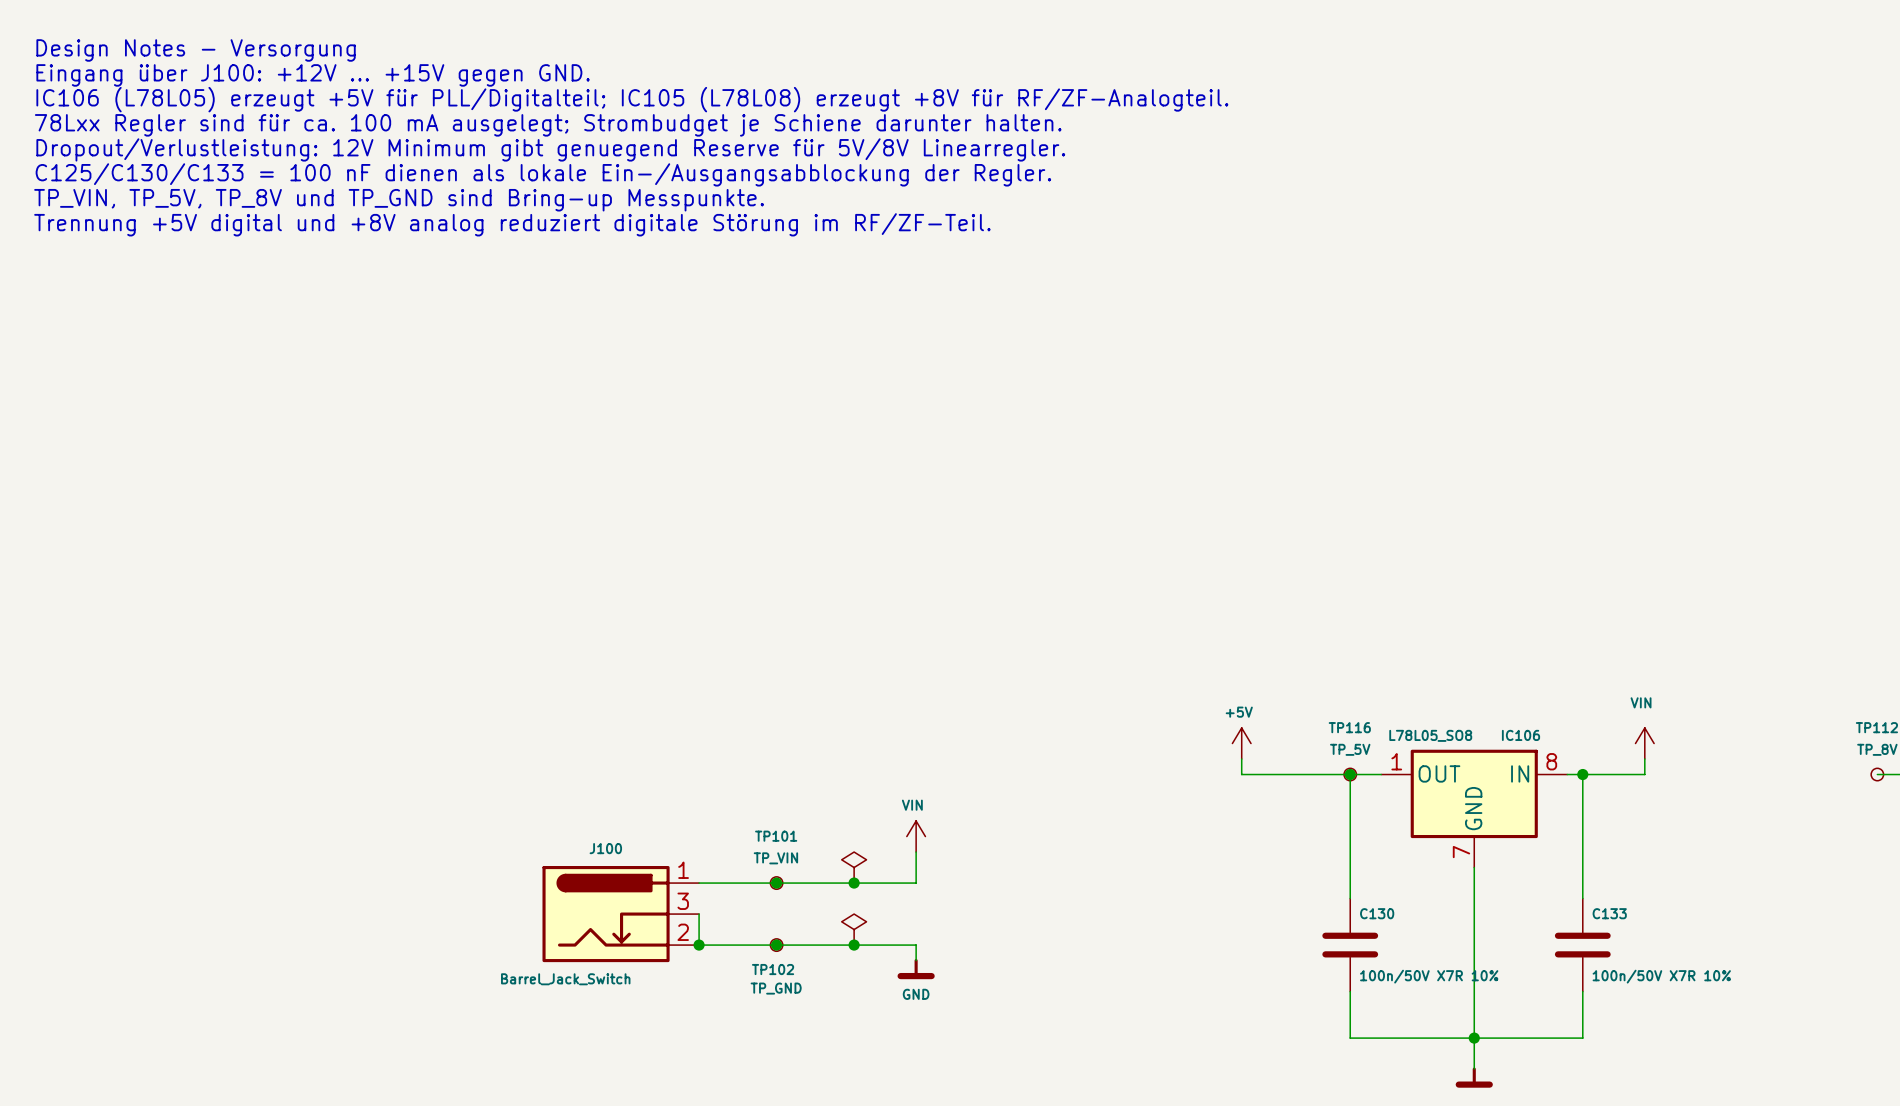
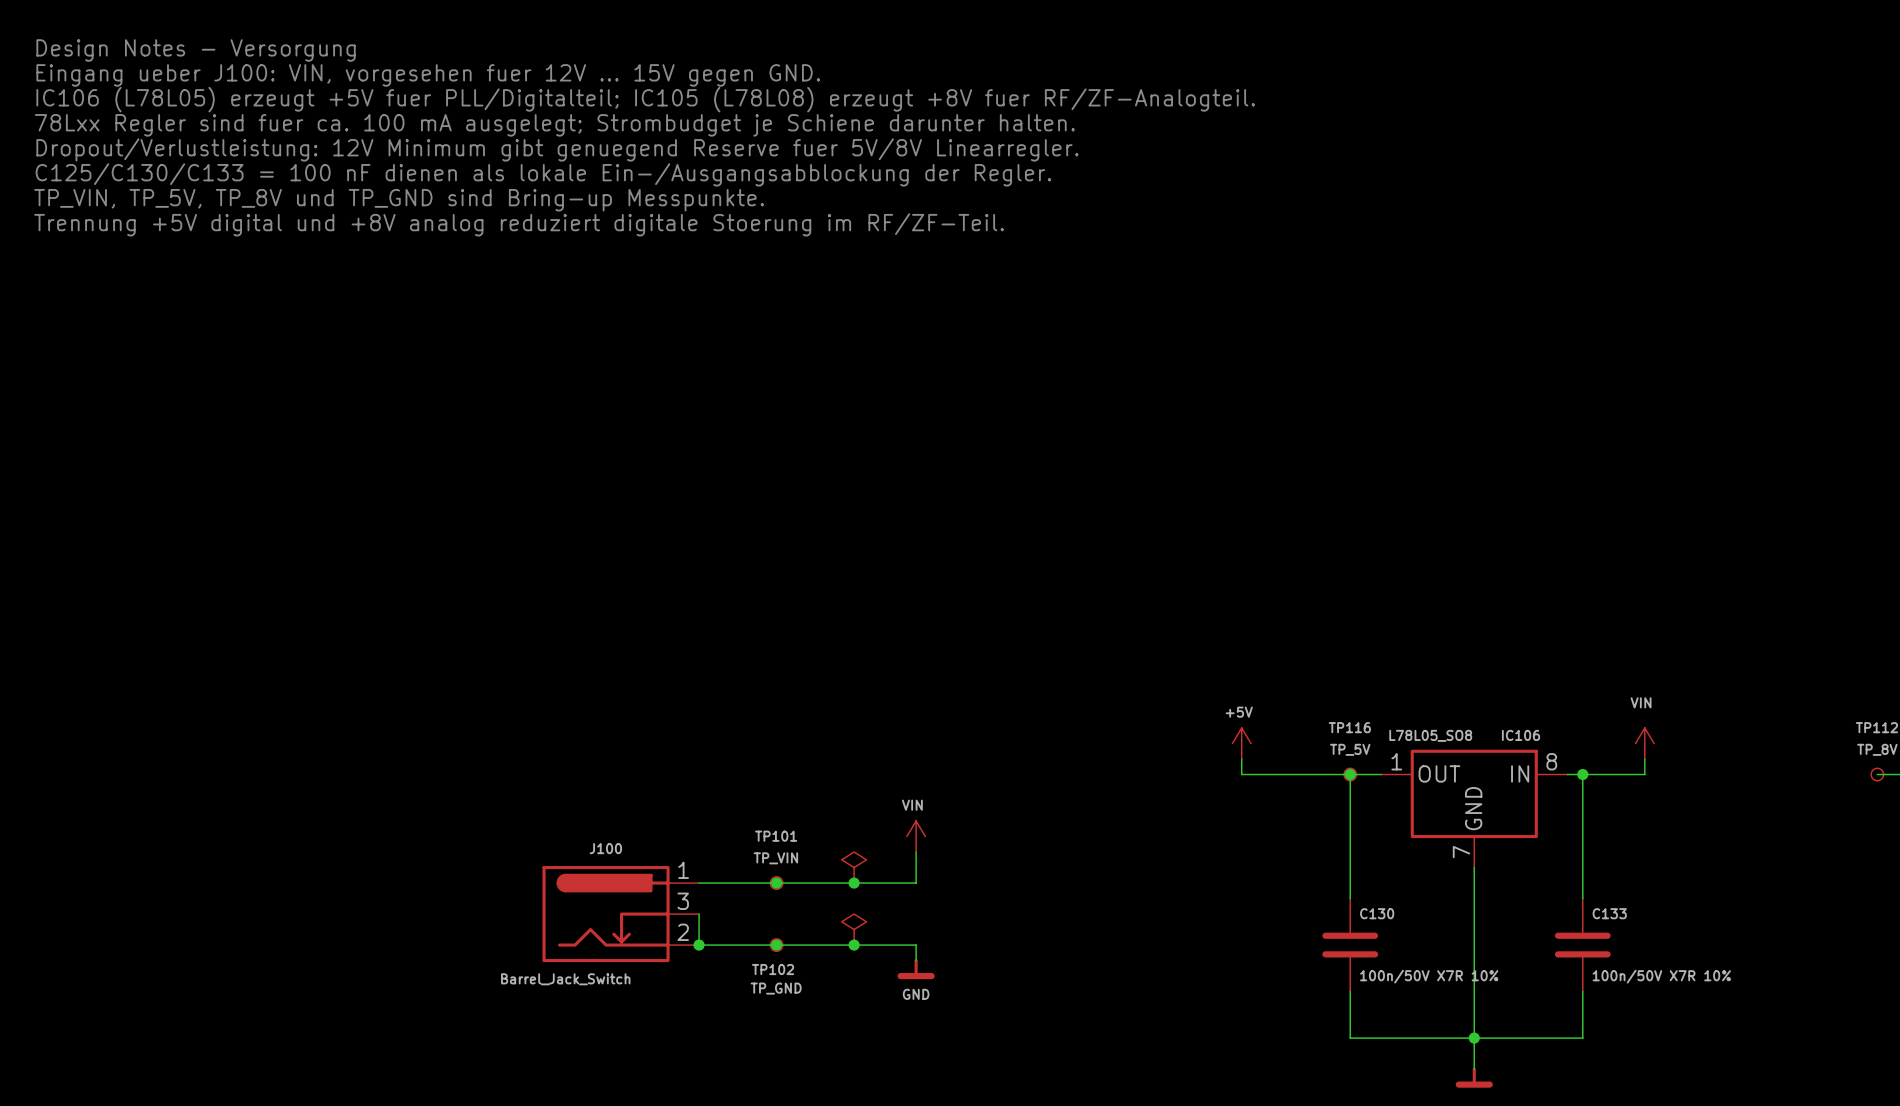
text: Eingang über J100: +12V ... +15V gegen GND. (313, 75) -> Eingang ueber J100: VIN, vorgesehen fuer 12V ... 15V gegen GND. (428, 75)
text: IC106 (L78L05) erzeugt +5V für PLL/Digitalteil; IC105 (L78L08) erzeugt +8V für RF/ZF-Analogteil. (632, 99) -> IC106 (L78L05) erzeugt +5V fuer PLL/Digitalteil; IC105 (L78L08) erzeugt +8V fuer RF/ZF-Analogteil. (645, 99)
text: 78Lxx Regler sind für ca. 100 mA ausgelegt; Strombudget je Schiene darunter halten. (548, 125) -> 78Lxx Regler sind fuer ca. 100 mA ausgelegt; Strombudget je Schiene darunter halten. (554, 125)
text: Dropout/Verlustleistung: 12V Minimum gibt genuegend Reserve für 5V/8V Linearregler. (550, 149) -> Dropout/Verlustleistung: 12V Minimum gibt genuegend Reserve fuer 5V/8V Linearregler. (557, 149)
text: Trennung +5V digital und +8V analog reduziert digitale Störung im RF/ZF-Teil. (512, 224) -> Trennung +5V digital und +8V analog reduziert digitale Stoerung im RF/ZF-Teil. (519, 224)

